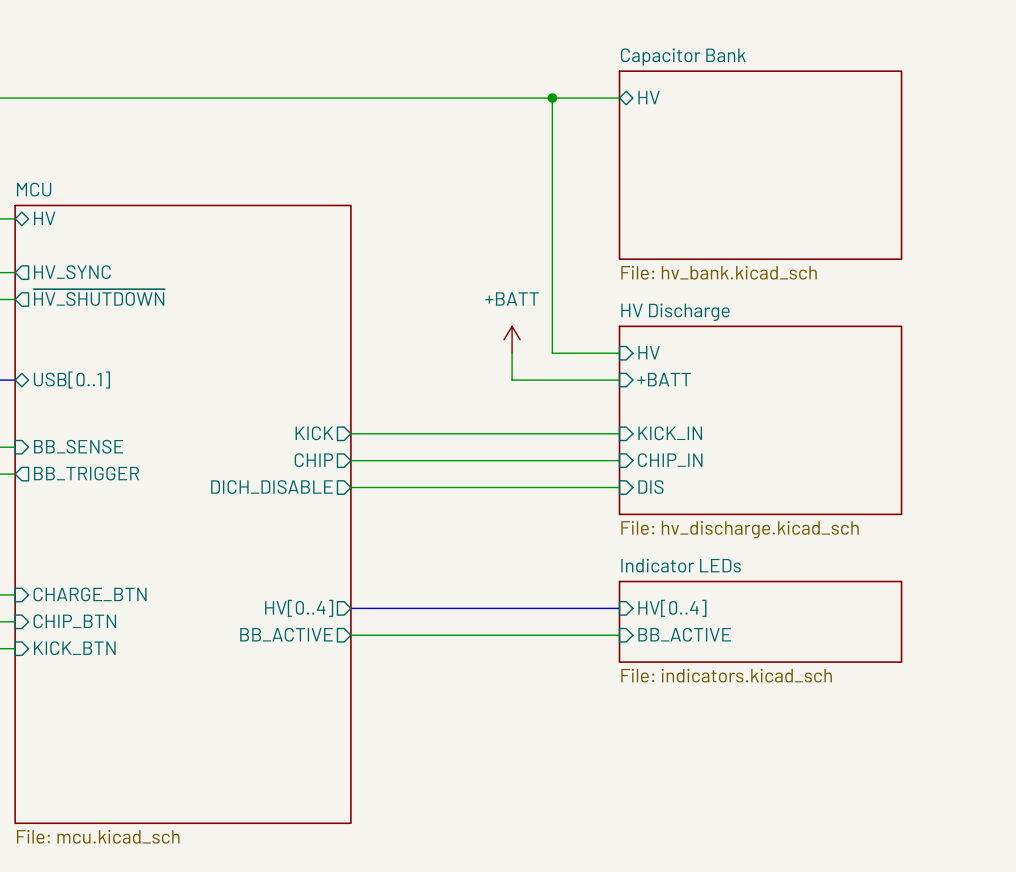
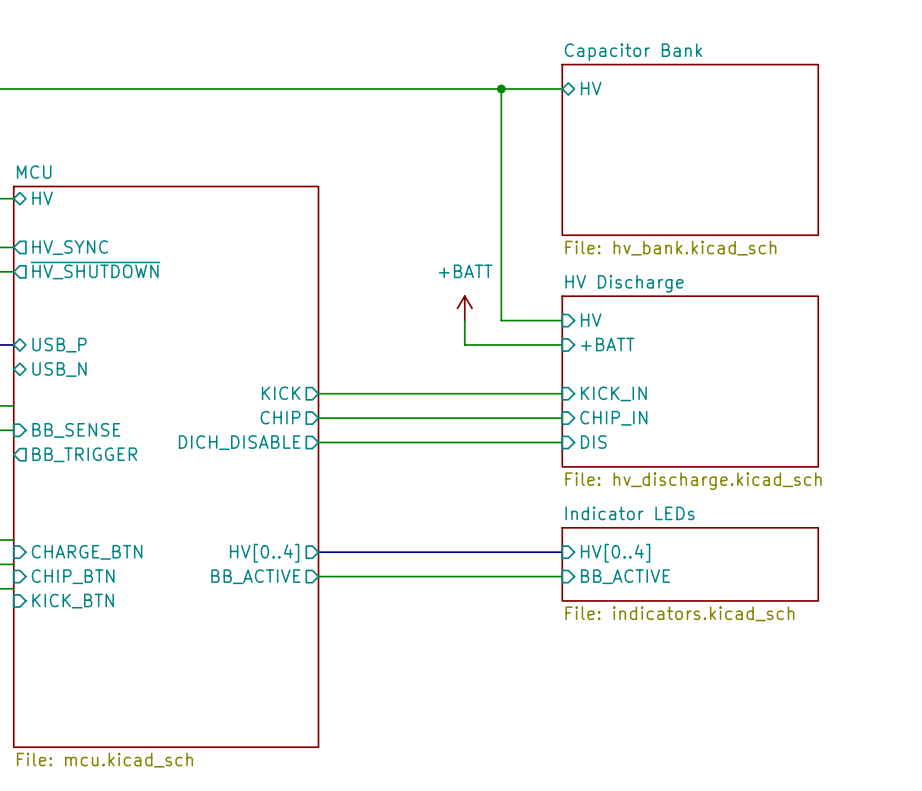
sheet pin: USB[0..1] (71, 380) -> USB_P (59, 345)
sheet pin: none -> USB_N (59, 369)
sheet pin: BB_SENSE (78, 446) -> none
sheet pin shape: output (86, 473) -> input (76, 430)
sheet pin: BB_TRIGGER (86, 473) -> BB_SENSE (76, 430)
sheet pin: none -> BB_TRIGGER (84, 454)
sheet pin position: CHARGE_BTN (90, 594) -> CHARGE_BTN (87, 552)
sheet pin position: CHIP_BTN (74, 621) -> CHIP_BTN (73, 576)
sheet pin position: KICK_BTN (74, 648) -> KICK_BTN (73, 601)

